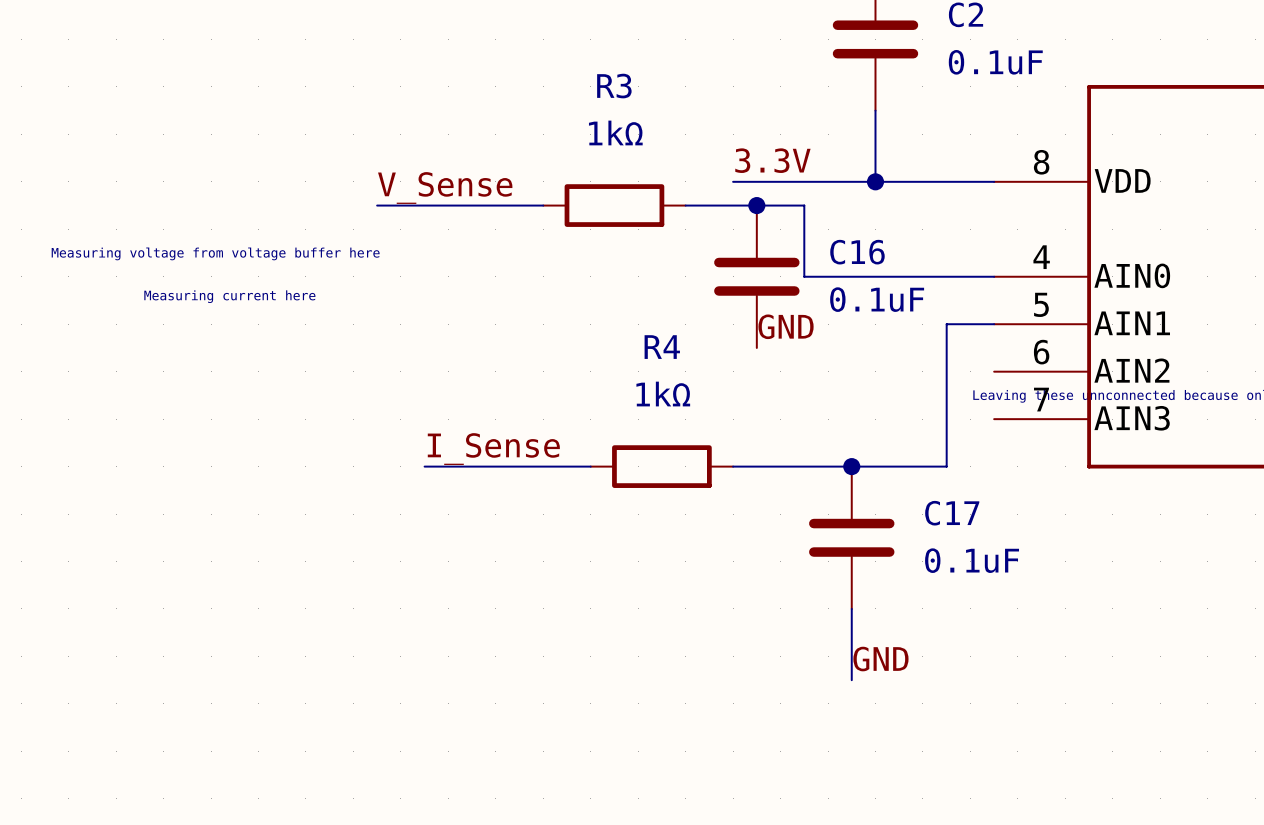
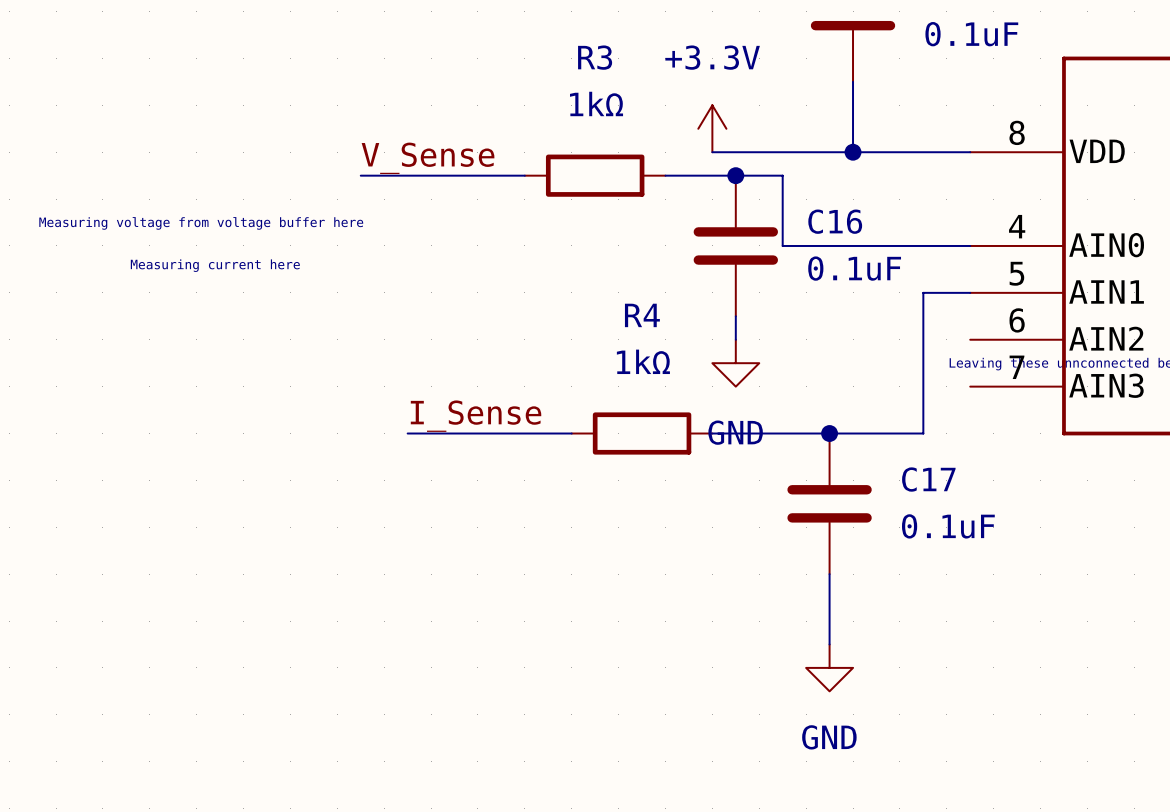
power symbol: none -> +3.3V (712, 128)
label: 3.3V (772, 160) -> none
label: GND (786, 326) -> none
wire: none -> (735, 316) (735, 339)
power symbol: none -> GND (735, 363)
label: GND (880, 659) -> none
power symbol: none -> GND (829, 667)

